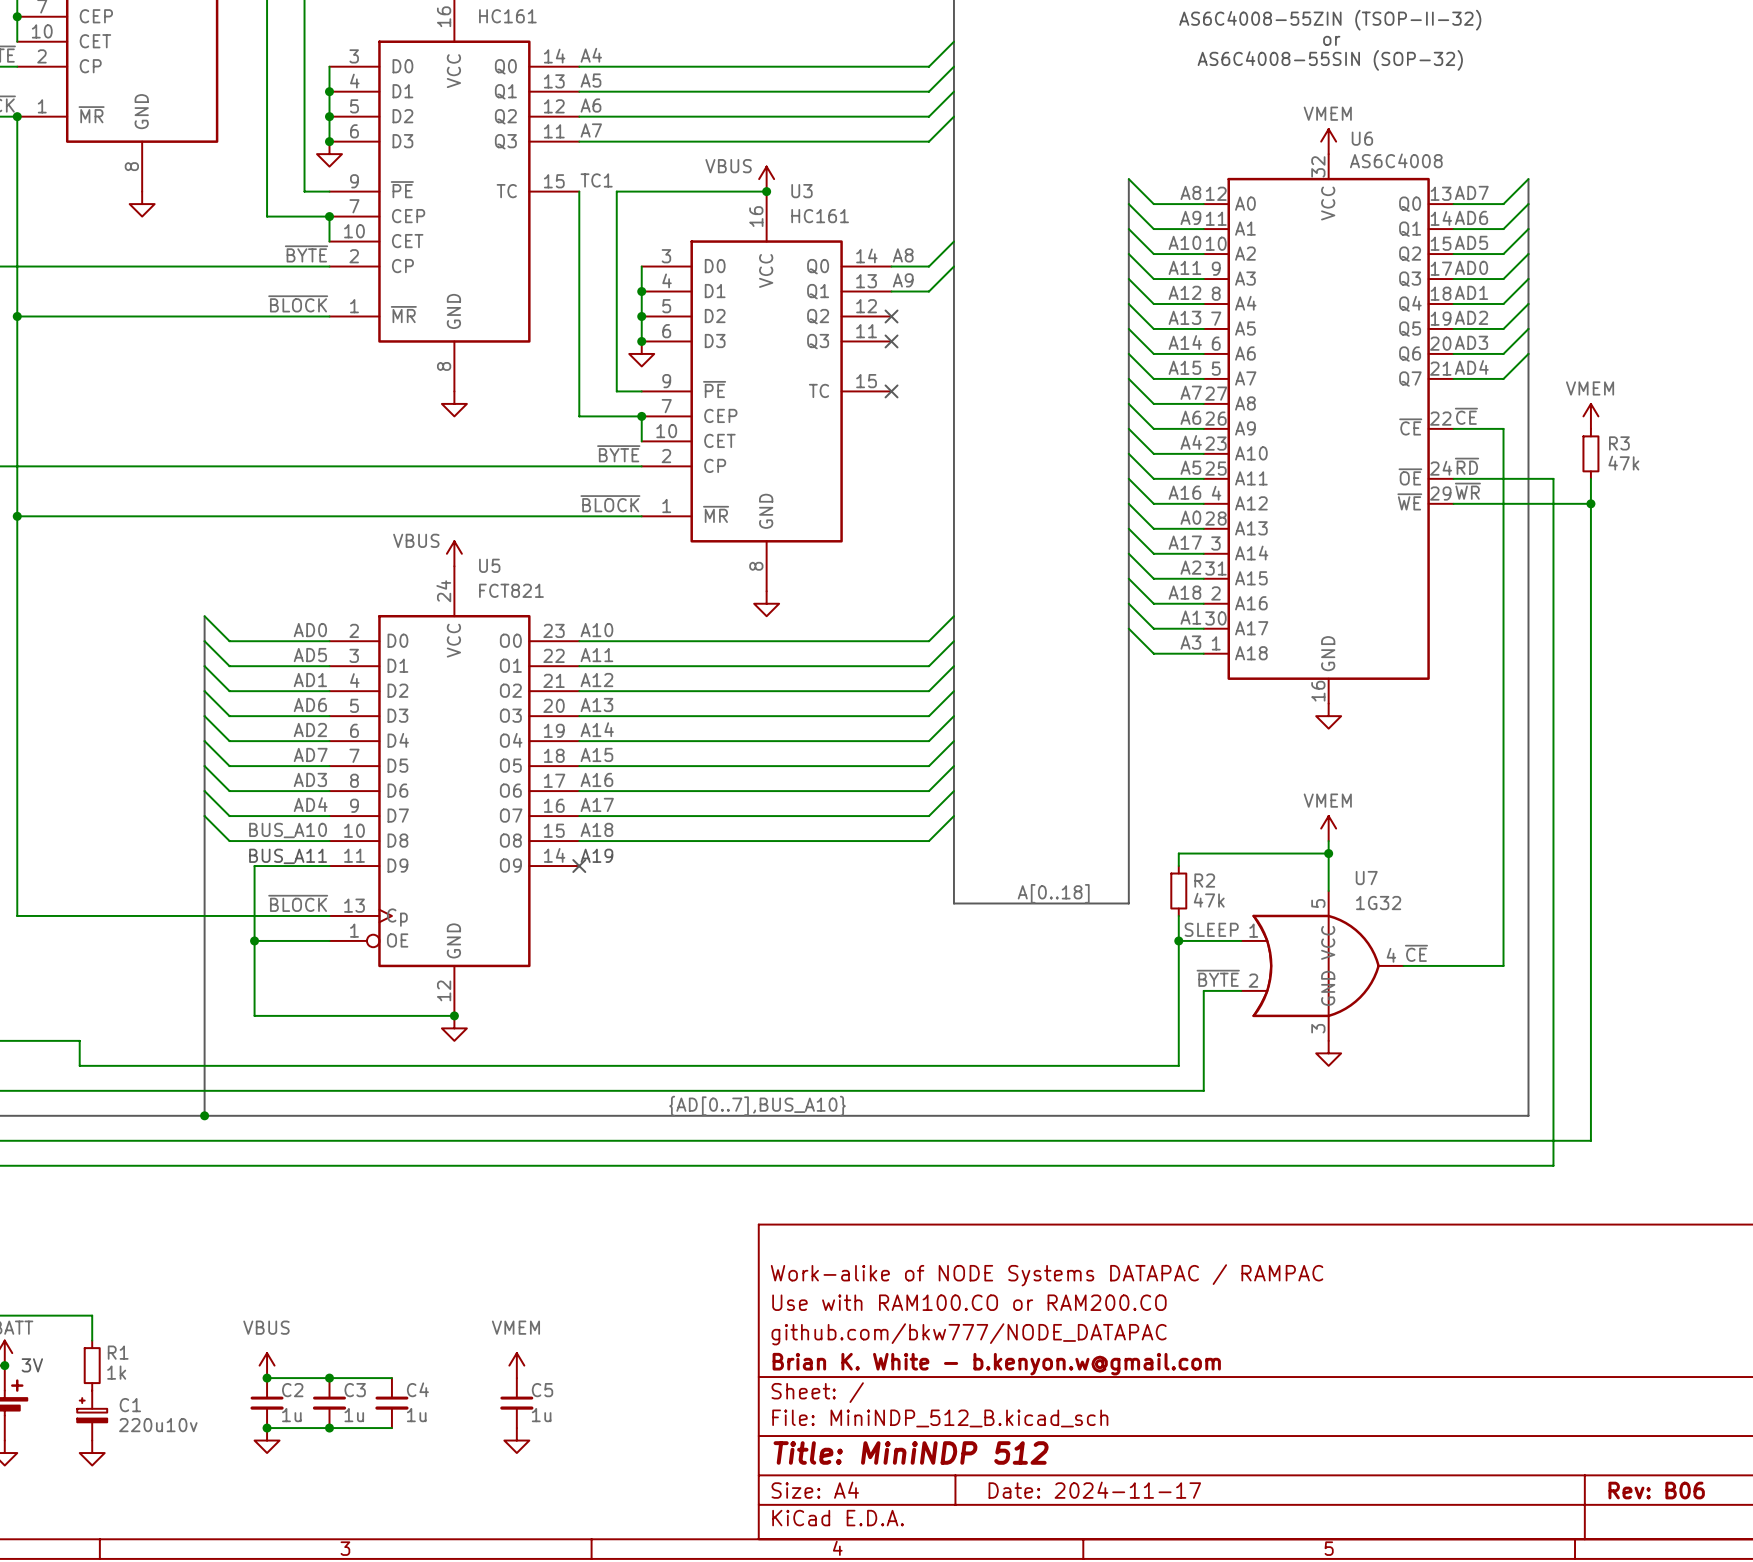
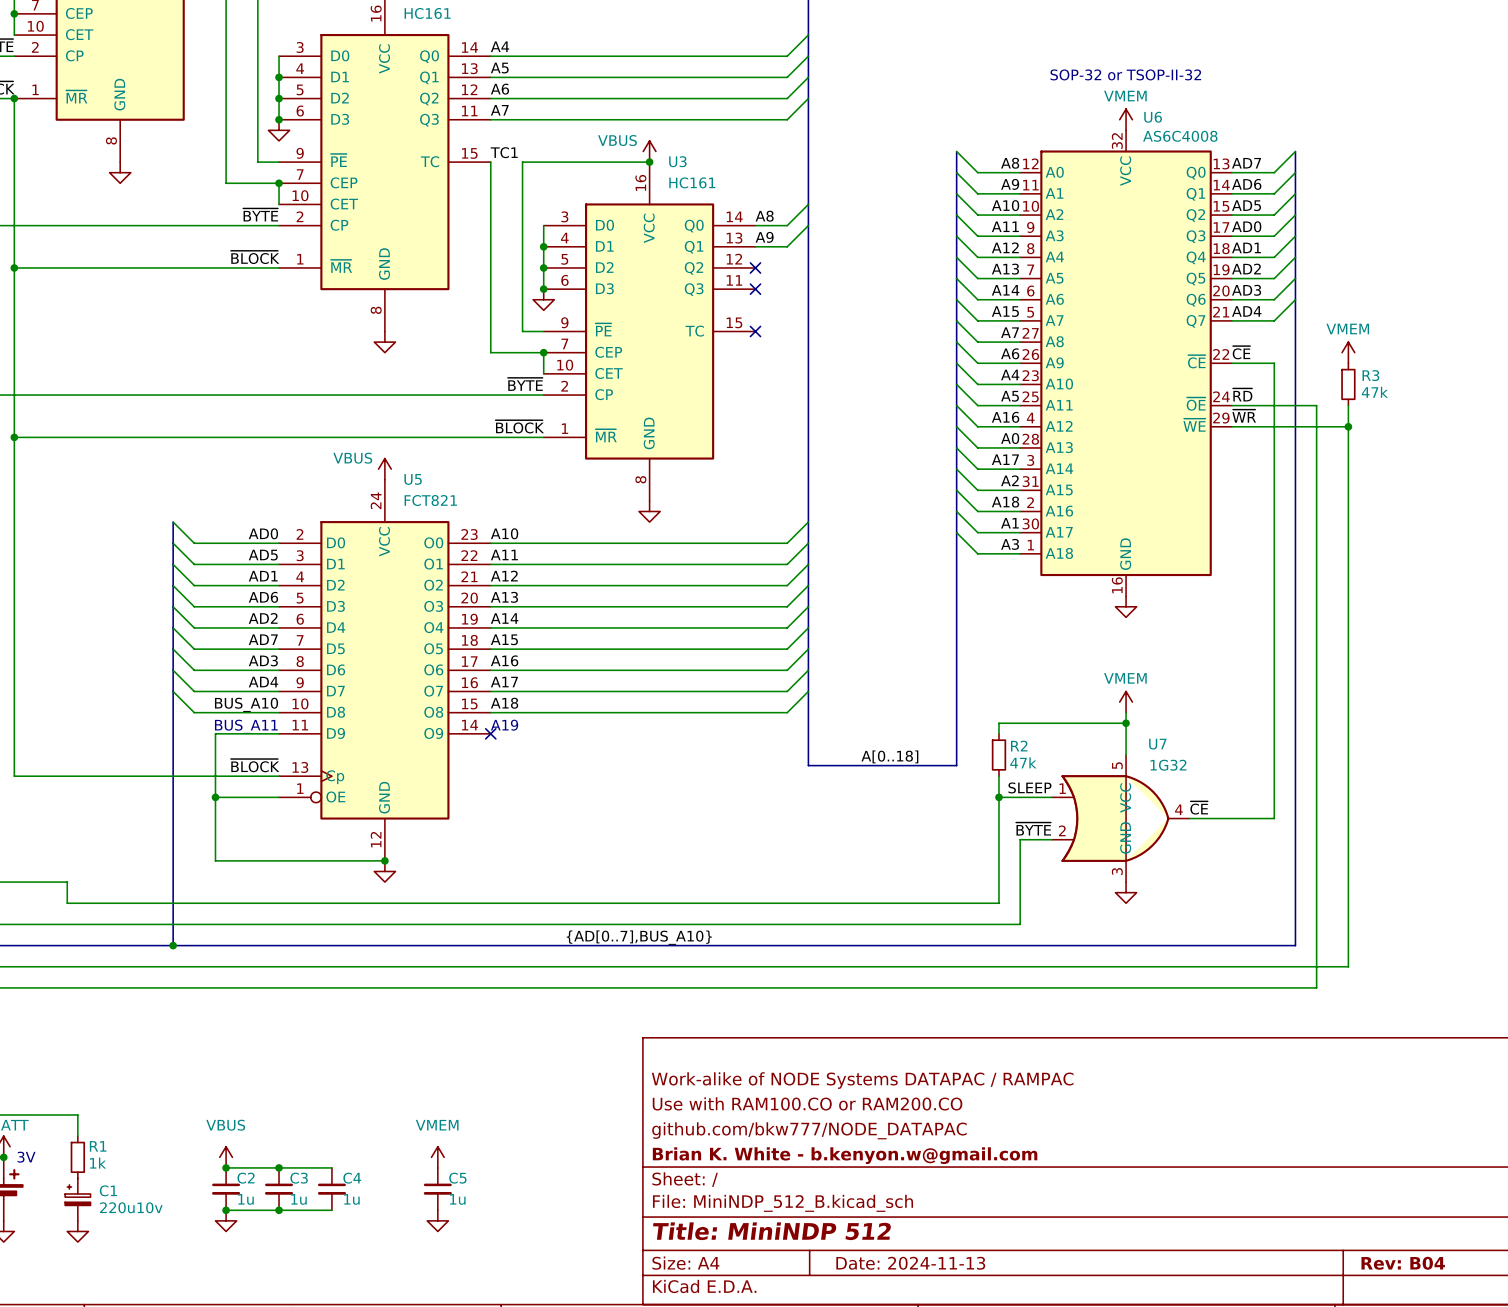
text: AS6C4008-55ZIN (TSOP-II-32) (1330, 20) -> none
text: or (1331, 40) -> none
text: AS6C4008-55SIN (SOP-32) (1330, 60) -> none
text: none -> SOP-32 or TSOP-II-32 (1125, 74)
title block: Date: 2024-11-17 (1094, 1490) -> Date: 2024-11-13 (910, 1263)
title block: Rev: B06 (1656, 1490) -> Rev: B04 (1403, 1263)

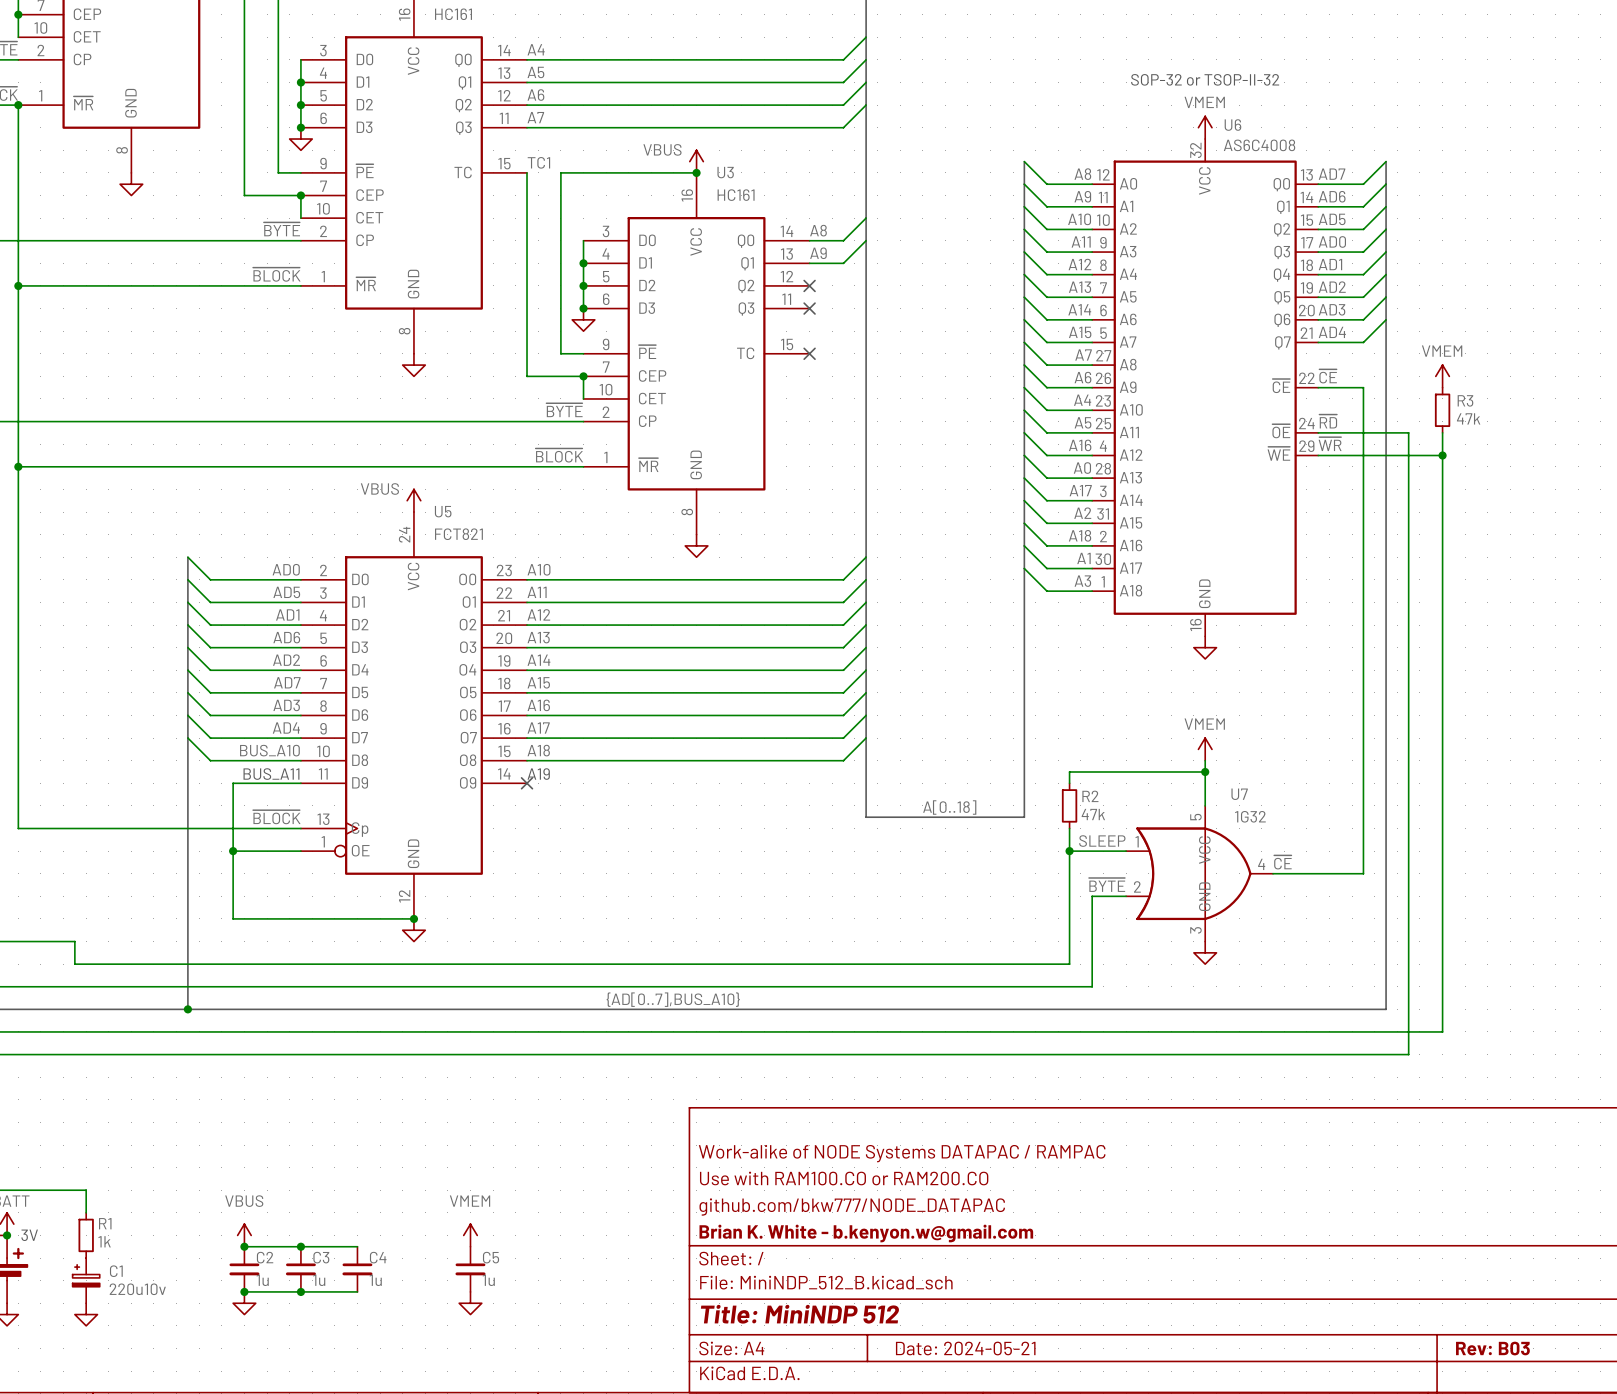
title block: Date: 2024-11-13 (910, 1263) -> Date: 2024-05-21 (965, 1348)
title block: Rev: B04 (1403, 1263) -> Rev: B03 (1492, 1348)

